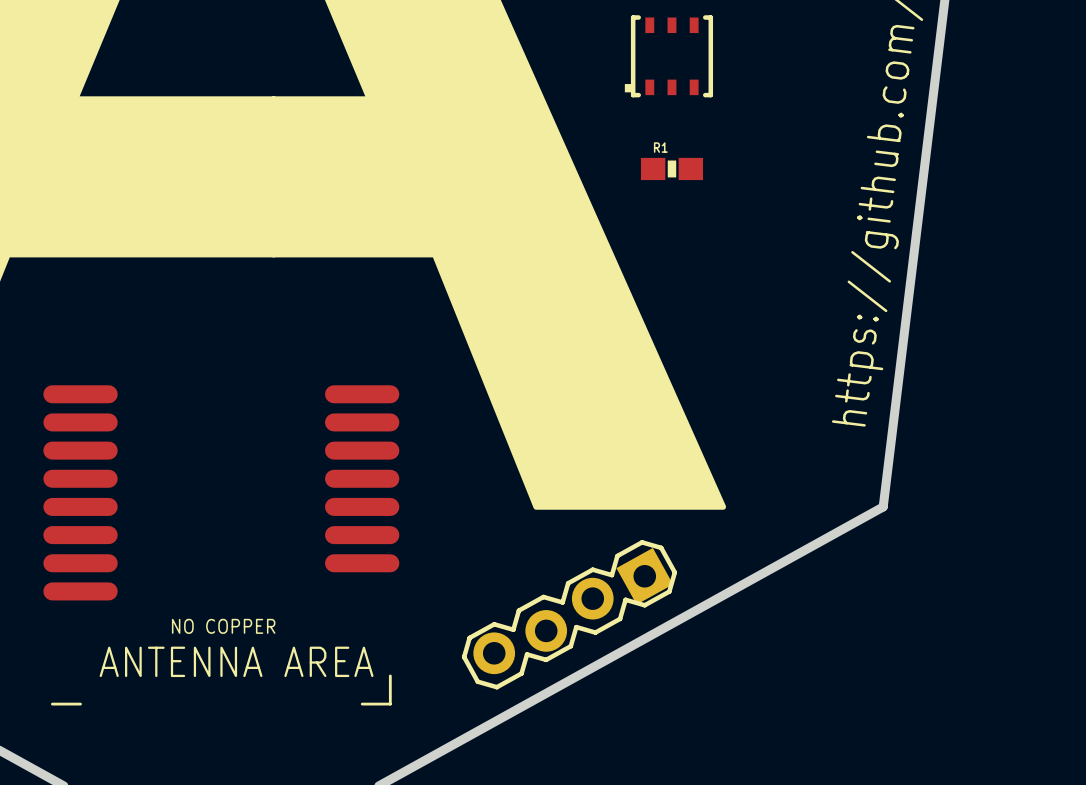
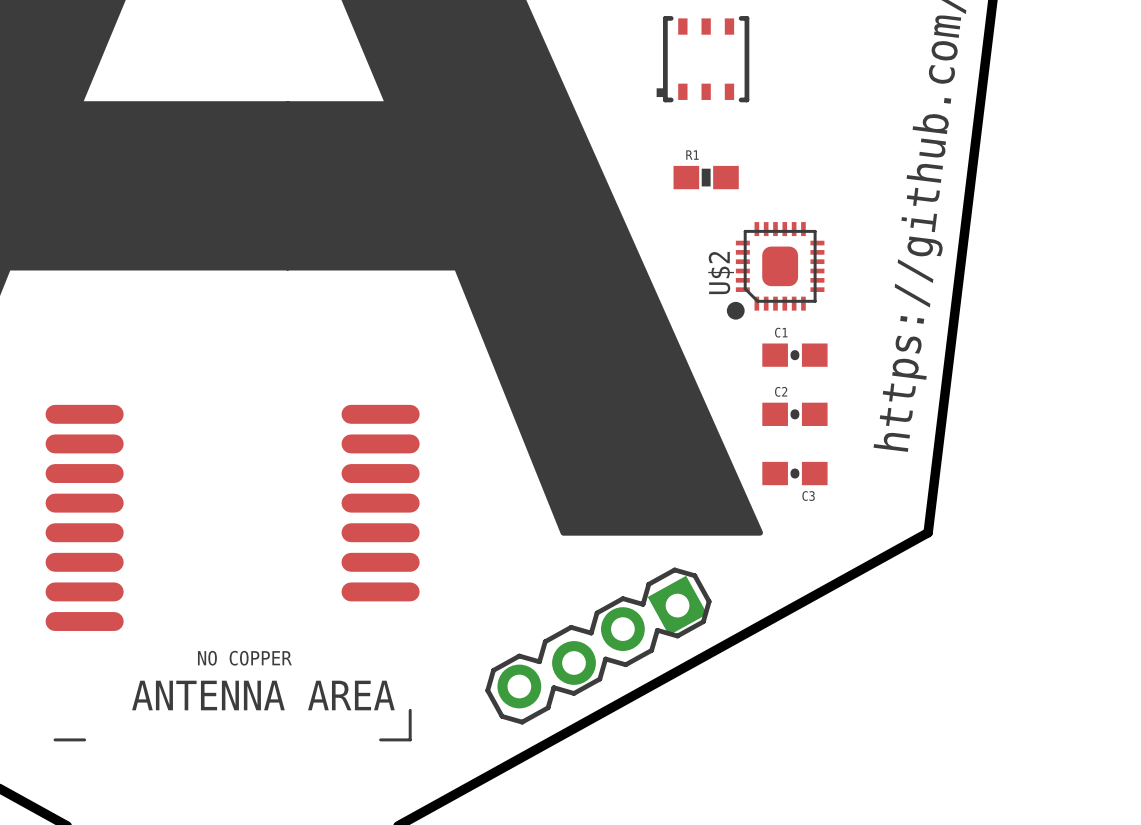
U$2: none -> (775, 270)
C1: none -> (794, 355)
C2: none -> (794, 414)
C3: none -> (794, 473)

